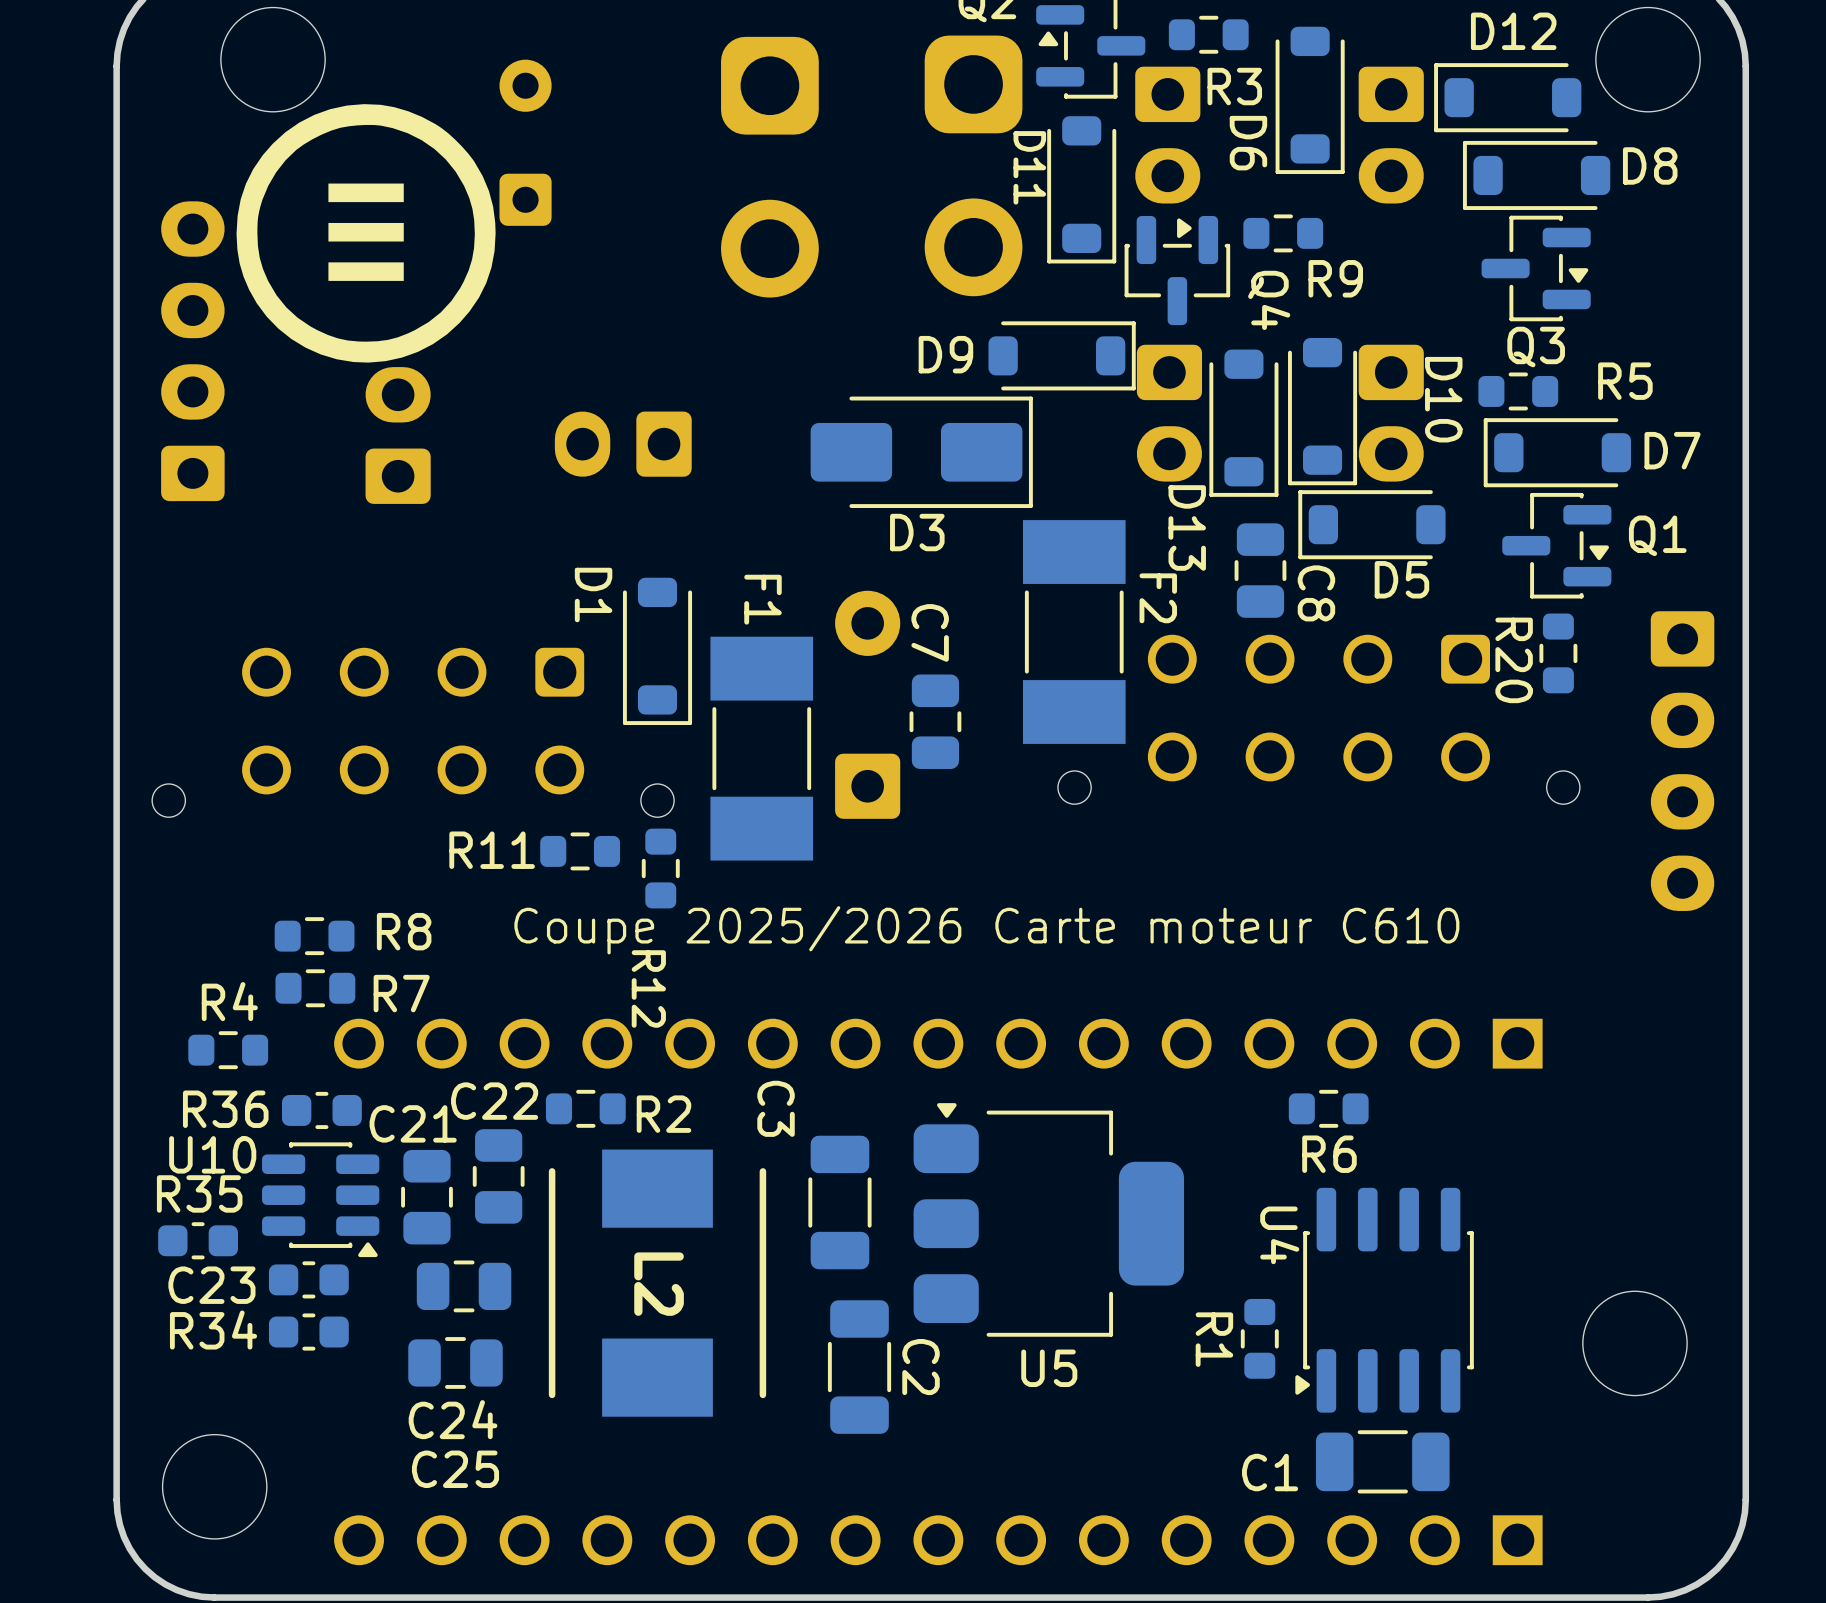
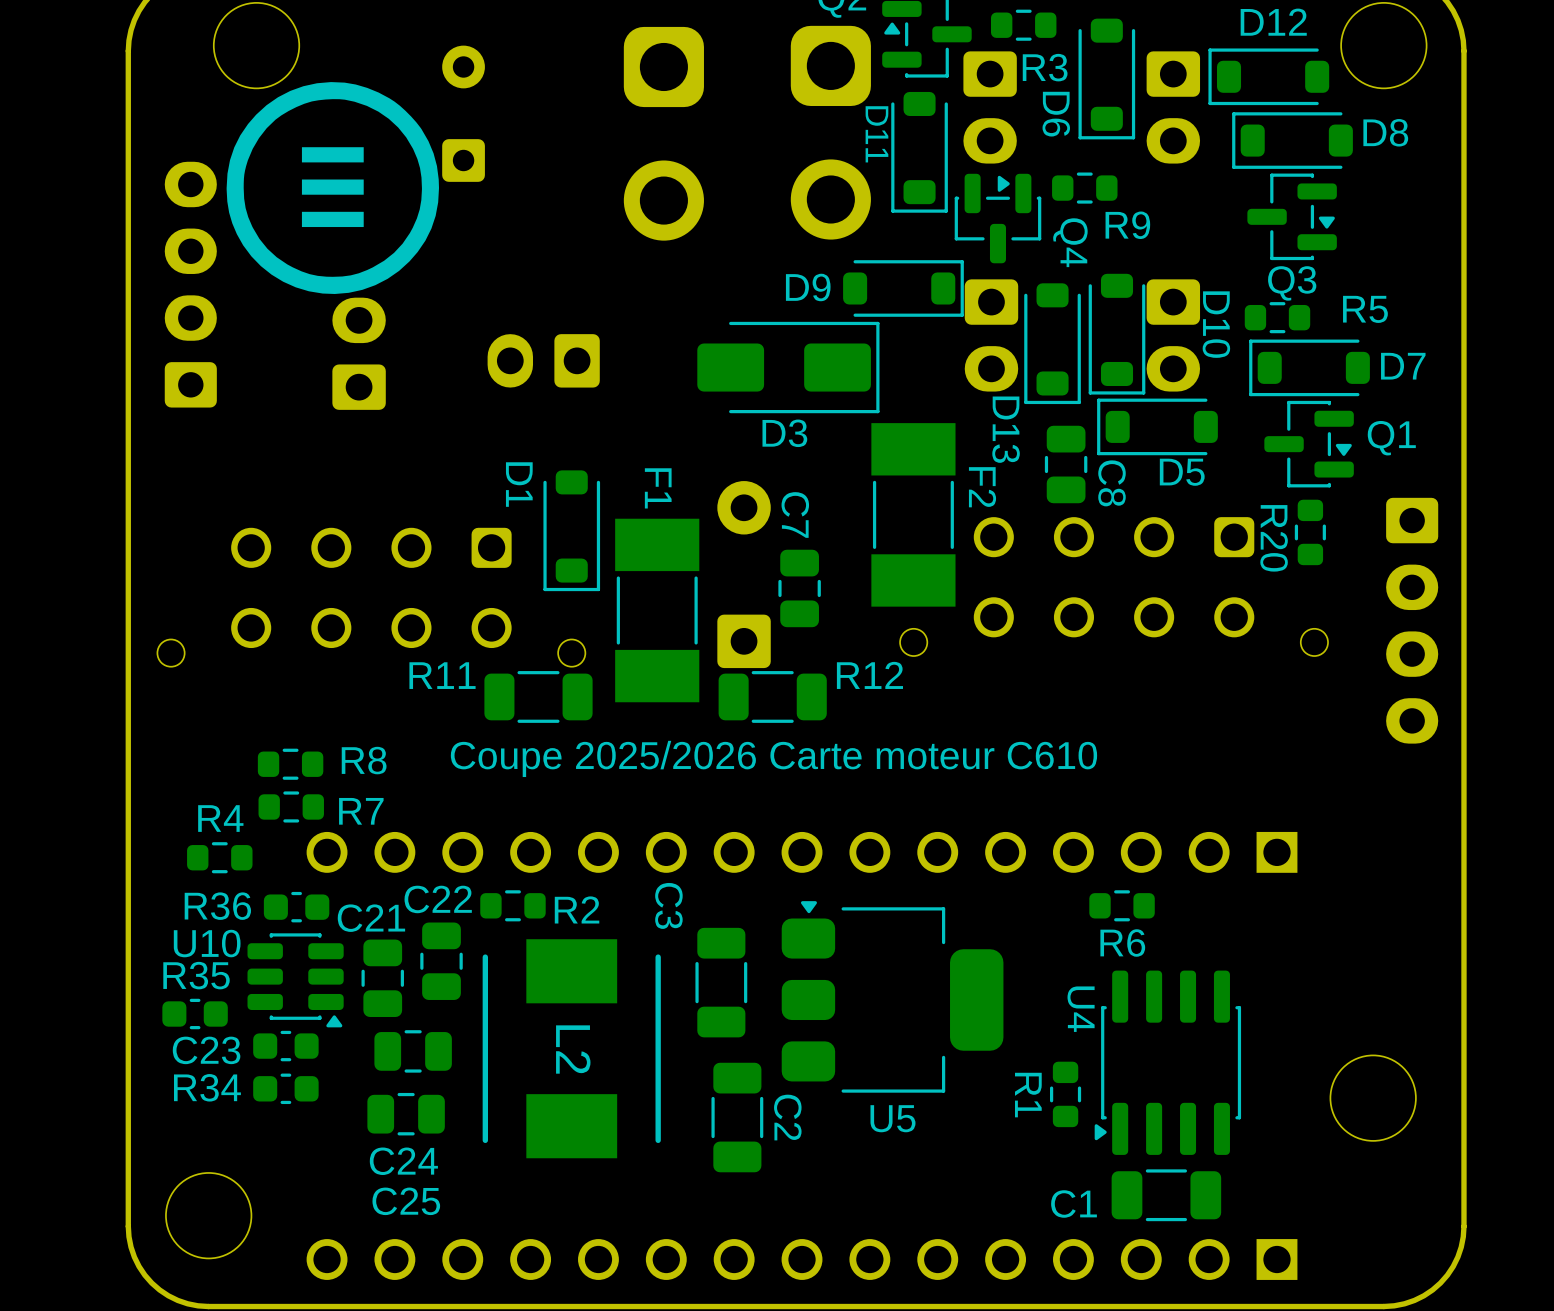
R12 footprint: [641, 828, 680, 909] -> [718, 671, 827, 723]
R11 footprint: [540, 832, 621, 871] -> [484, 671, 593, 723]
R12 name position: R12 (648, 988) -> R12 (869, 675)

